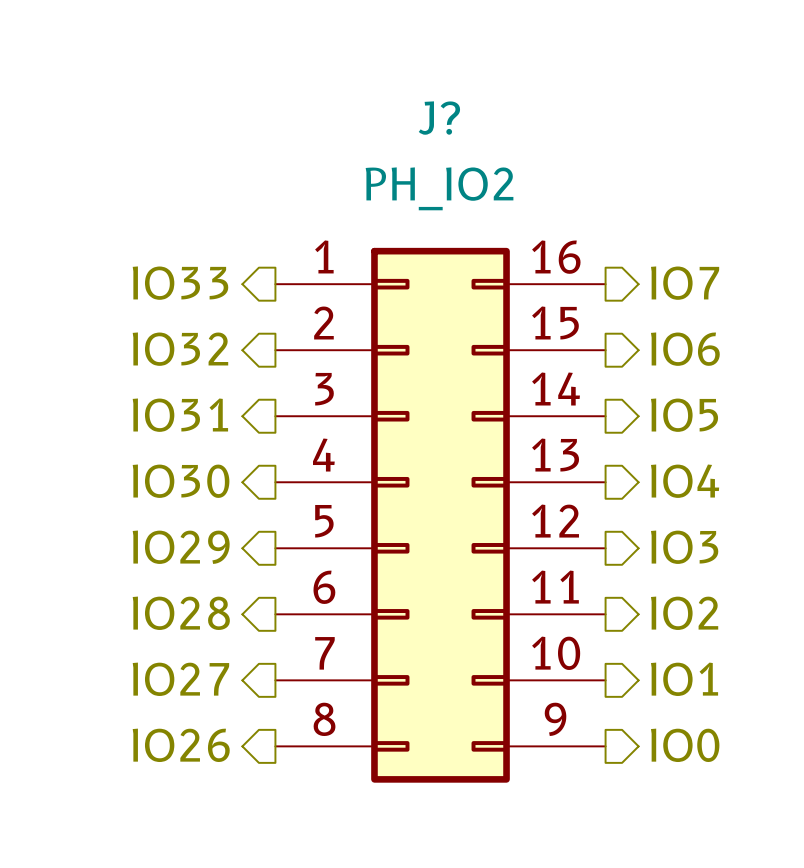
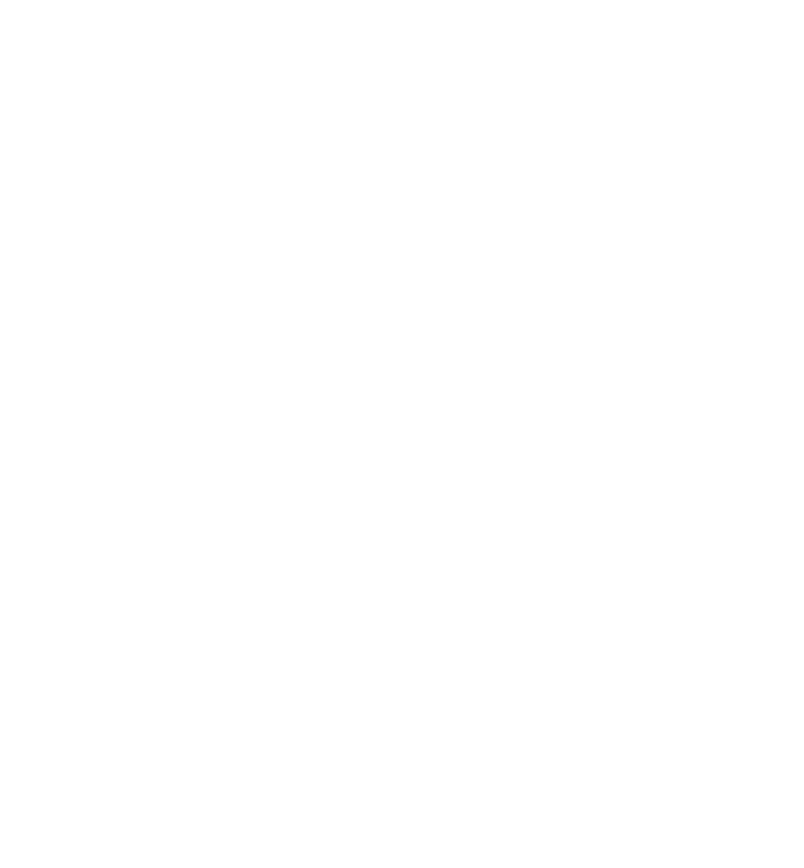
hierarchical label: IO33 (180, 283) -> none
hierarchical label: IO7 (685, 283) -> none
hierarchical label: IO32 (180, 349) -> none
hierarchical label: IO6 (685, 349) -> none
hierarchical label: IO31 (180, 415) -> none
hierarchical label: IO5 (684, 415) -> none
hierarchical label: IO30 (181, 481) -> none
hierarchical label: IO4 (685, 481) -> none
J?: PH_IO2 (440, 515) -> none
hierarchical label: IO29 (181, 547) -> none
hierarchical label: IO3 (684, 547) -> none
hierarchical label: IO28 (181, 613) -> none
hierarchical label: IO2 (684, 613) -> none
hierarchical label: IO27 (180, 679) -> none
hierarchical label: IO1 (684, 679) -> none
hierarchical label: IO26 (181, 745) -> none
hierarchical label: IO0 (685, 745) -> none

